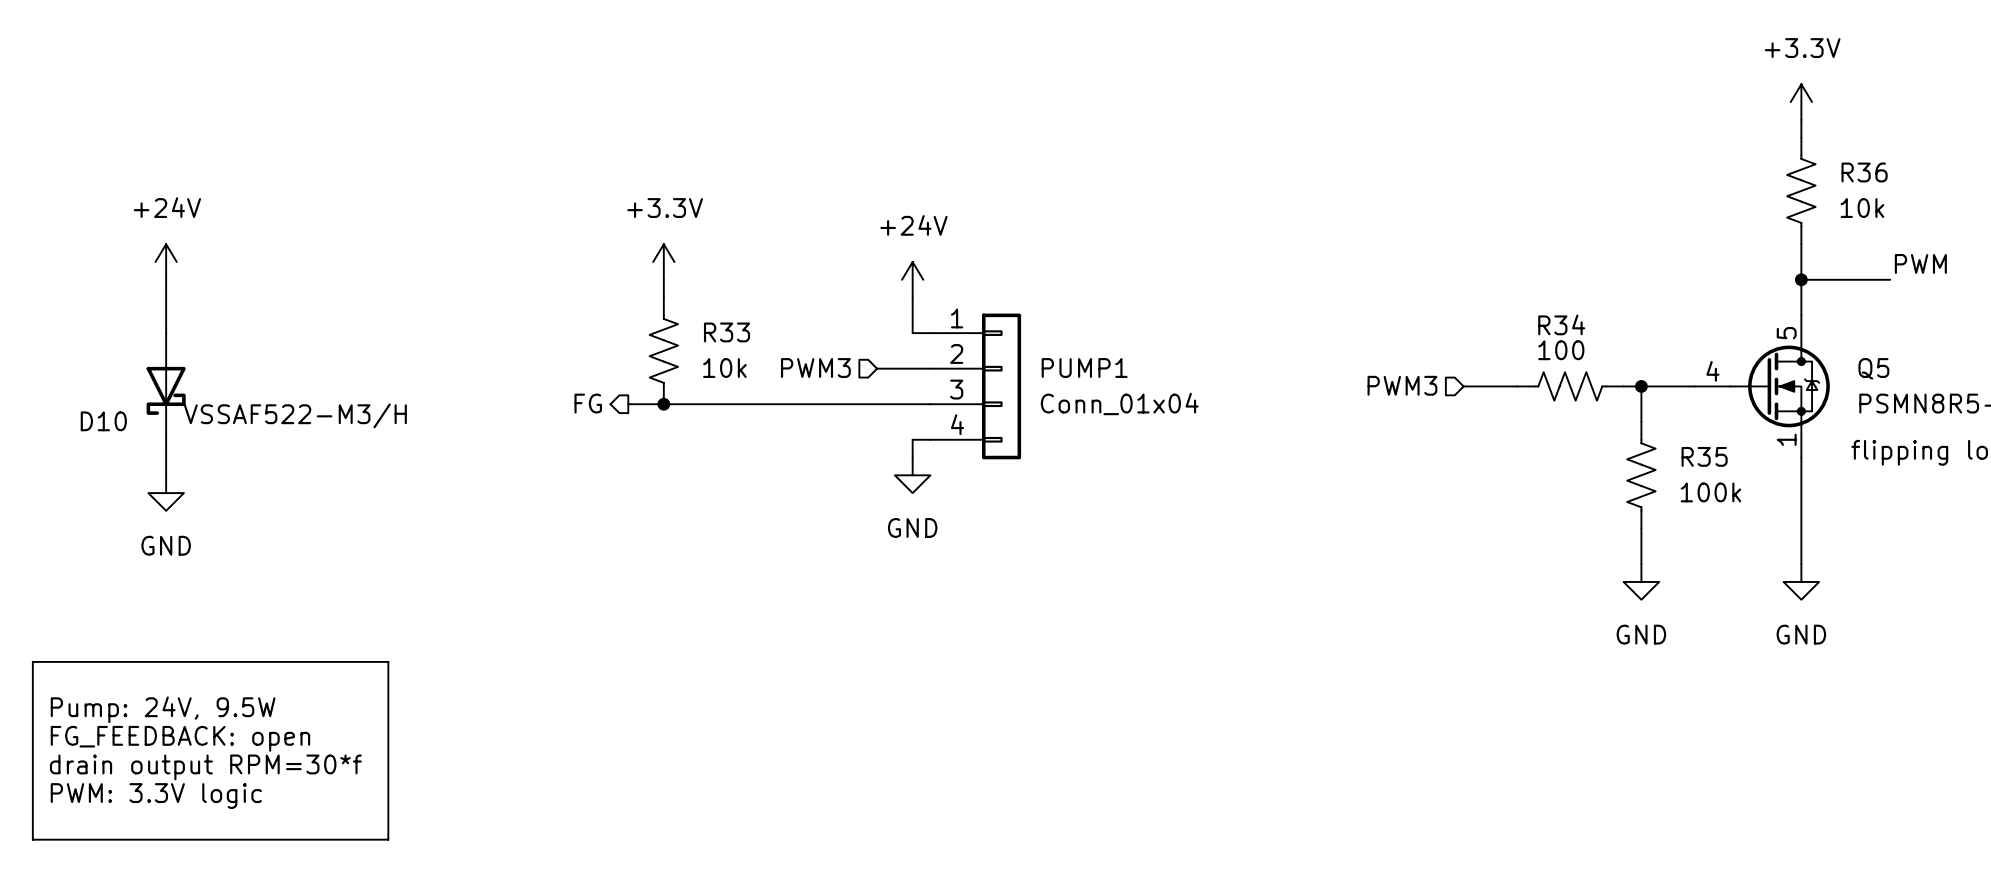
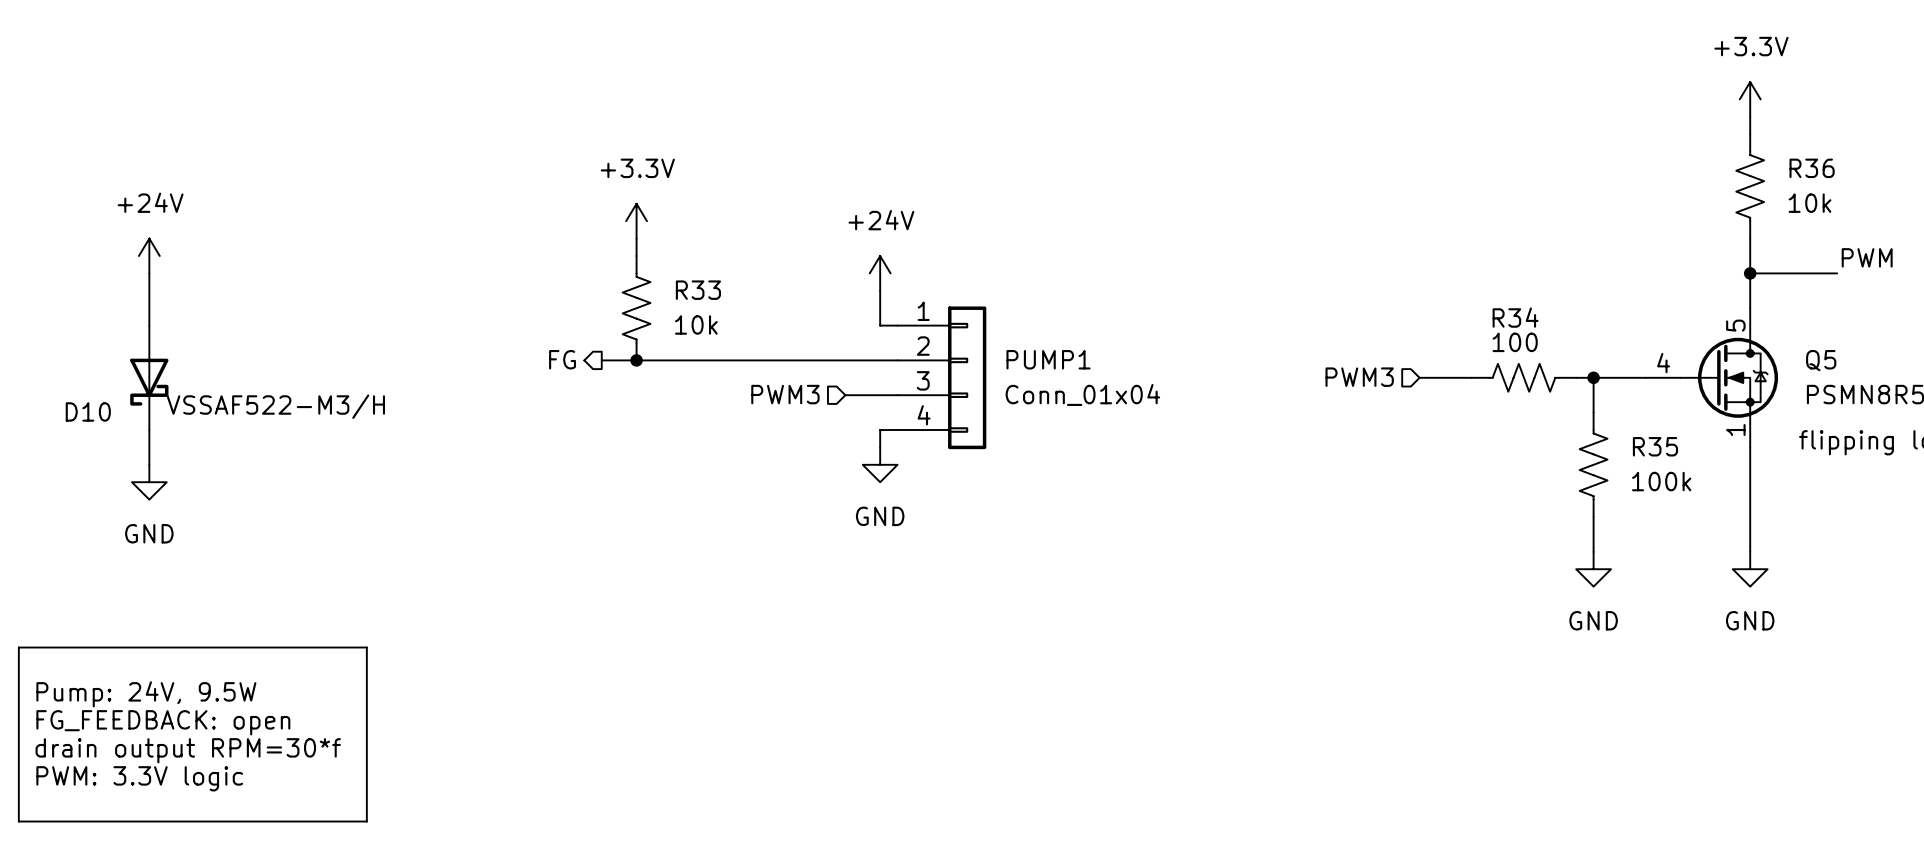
power symbol position: +3.3V (663, 262) -> +3.3V (636, 221)
R33 position: (663, 350) -> (636, 308)
hierarchical label position: PWM3 (815, 368) -> PWM3 (785, 394)
hierarchical label position: FG (588, 403) -> FG (562, 359)
wire: (628, 404) (877, 404) -> (601, 360) (845, 360)
junction position: (663, 404) -> (636, 360)

